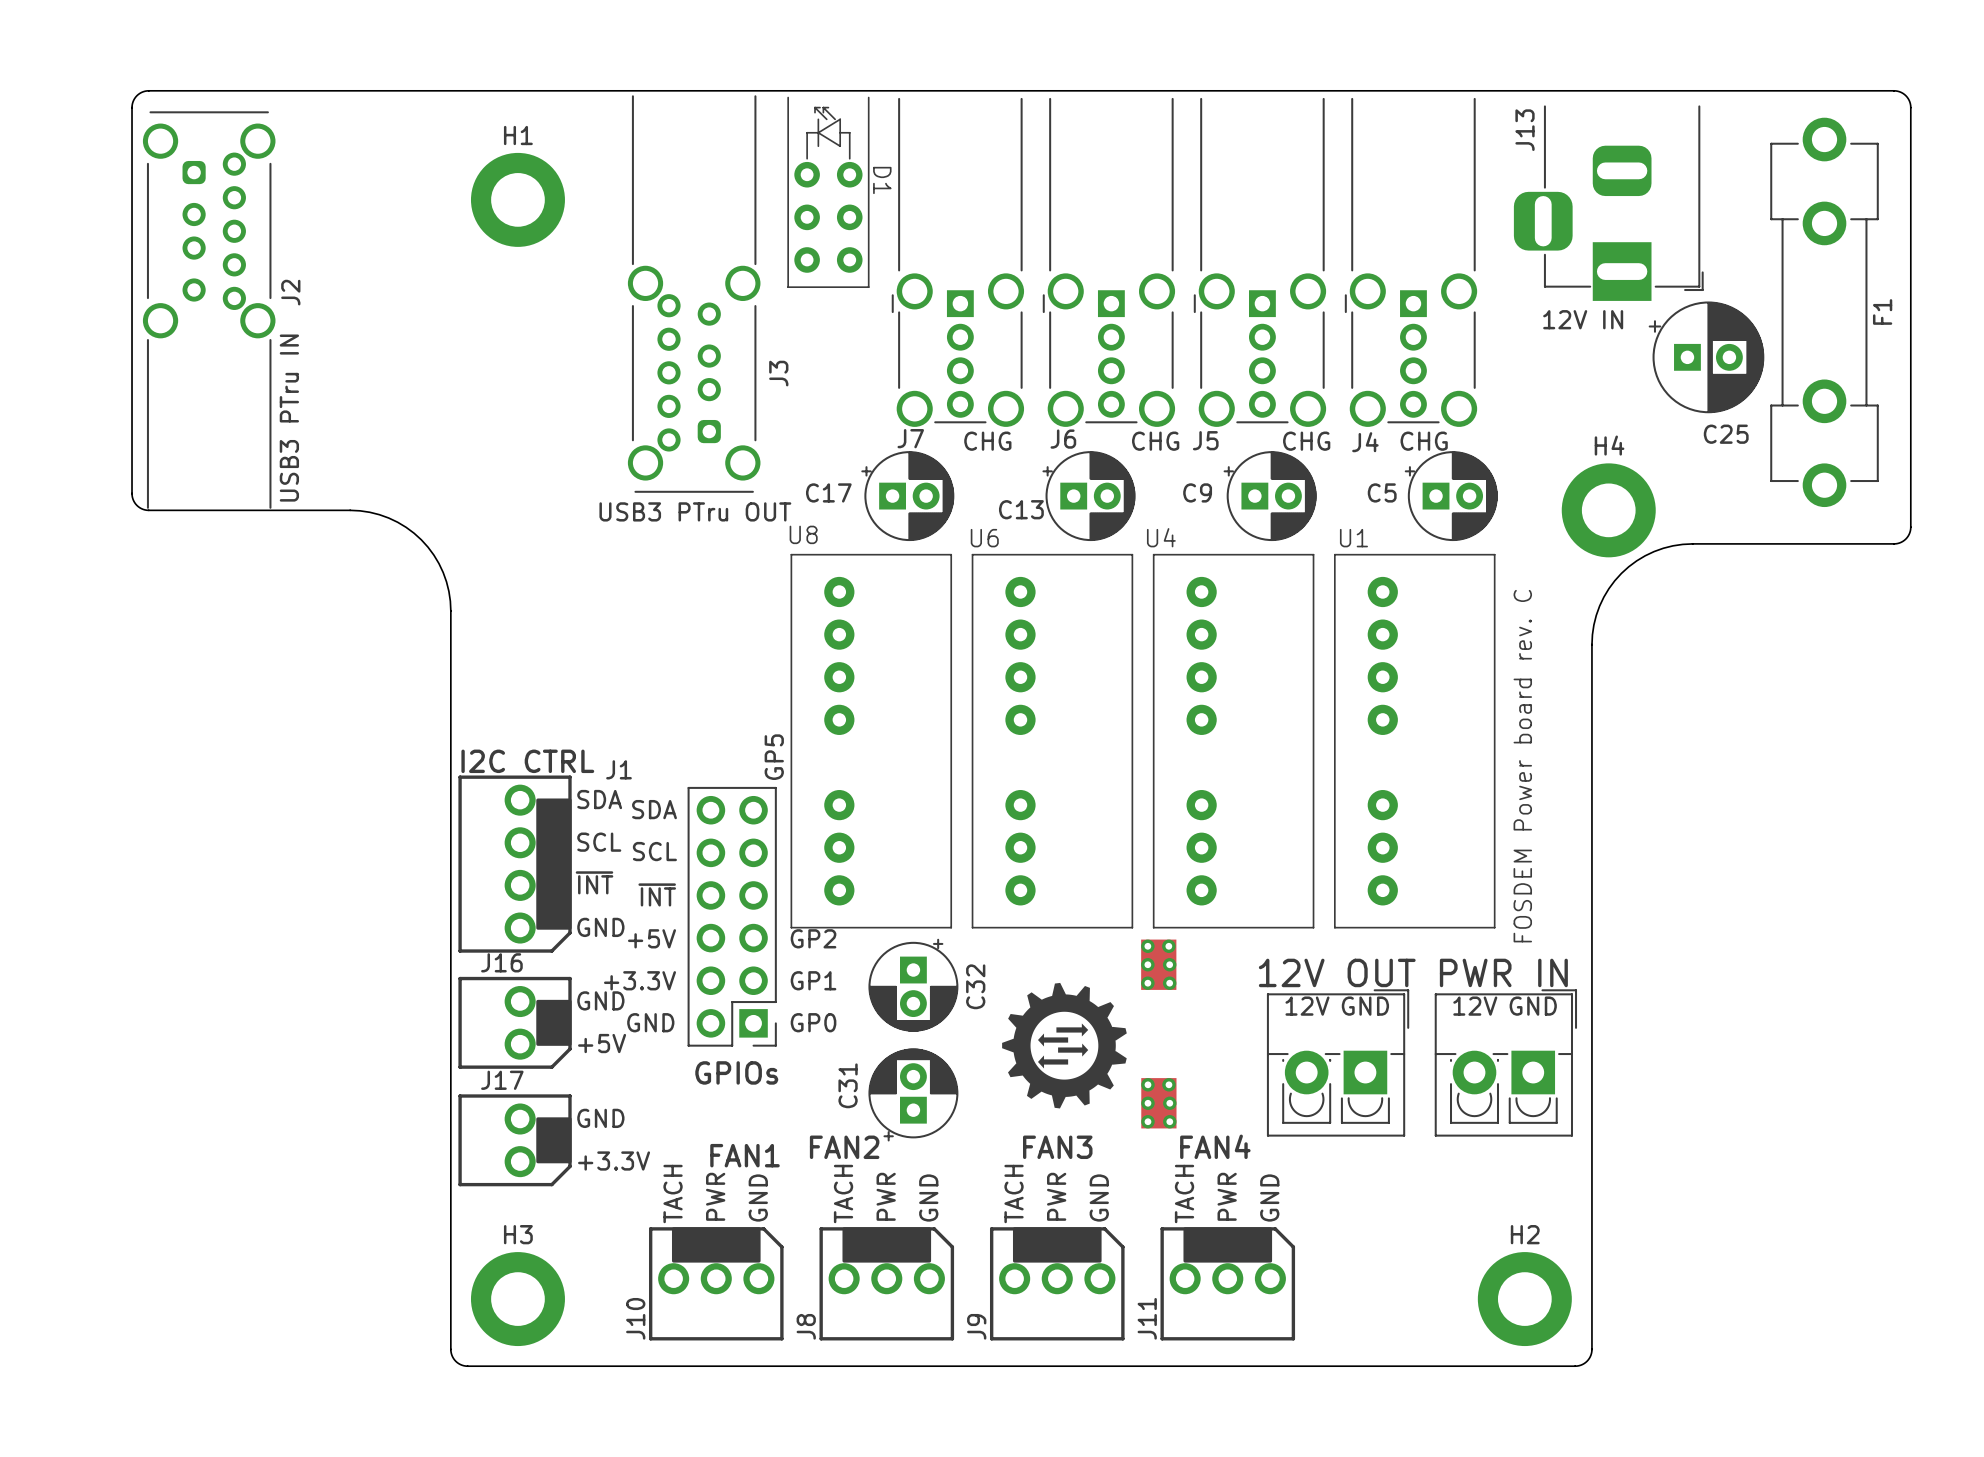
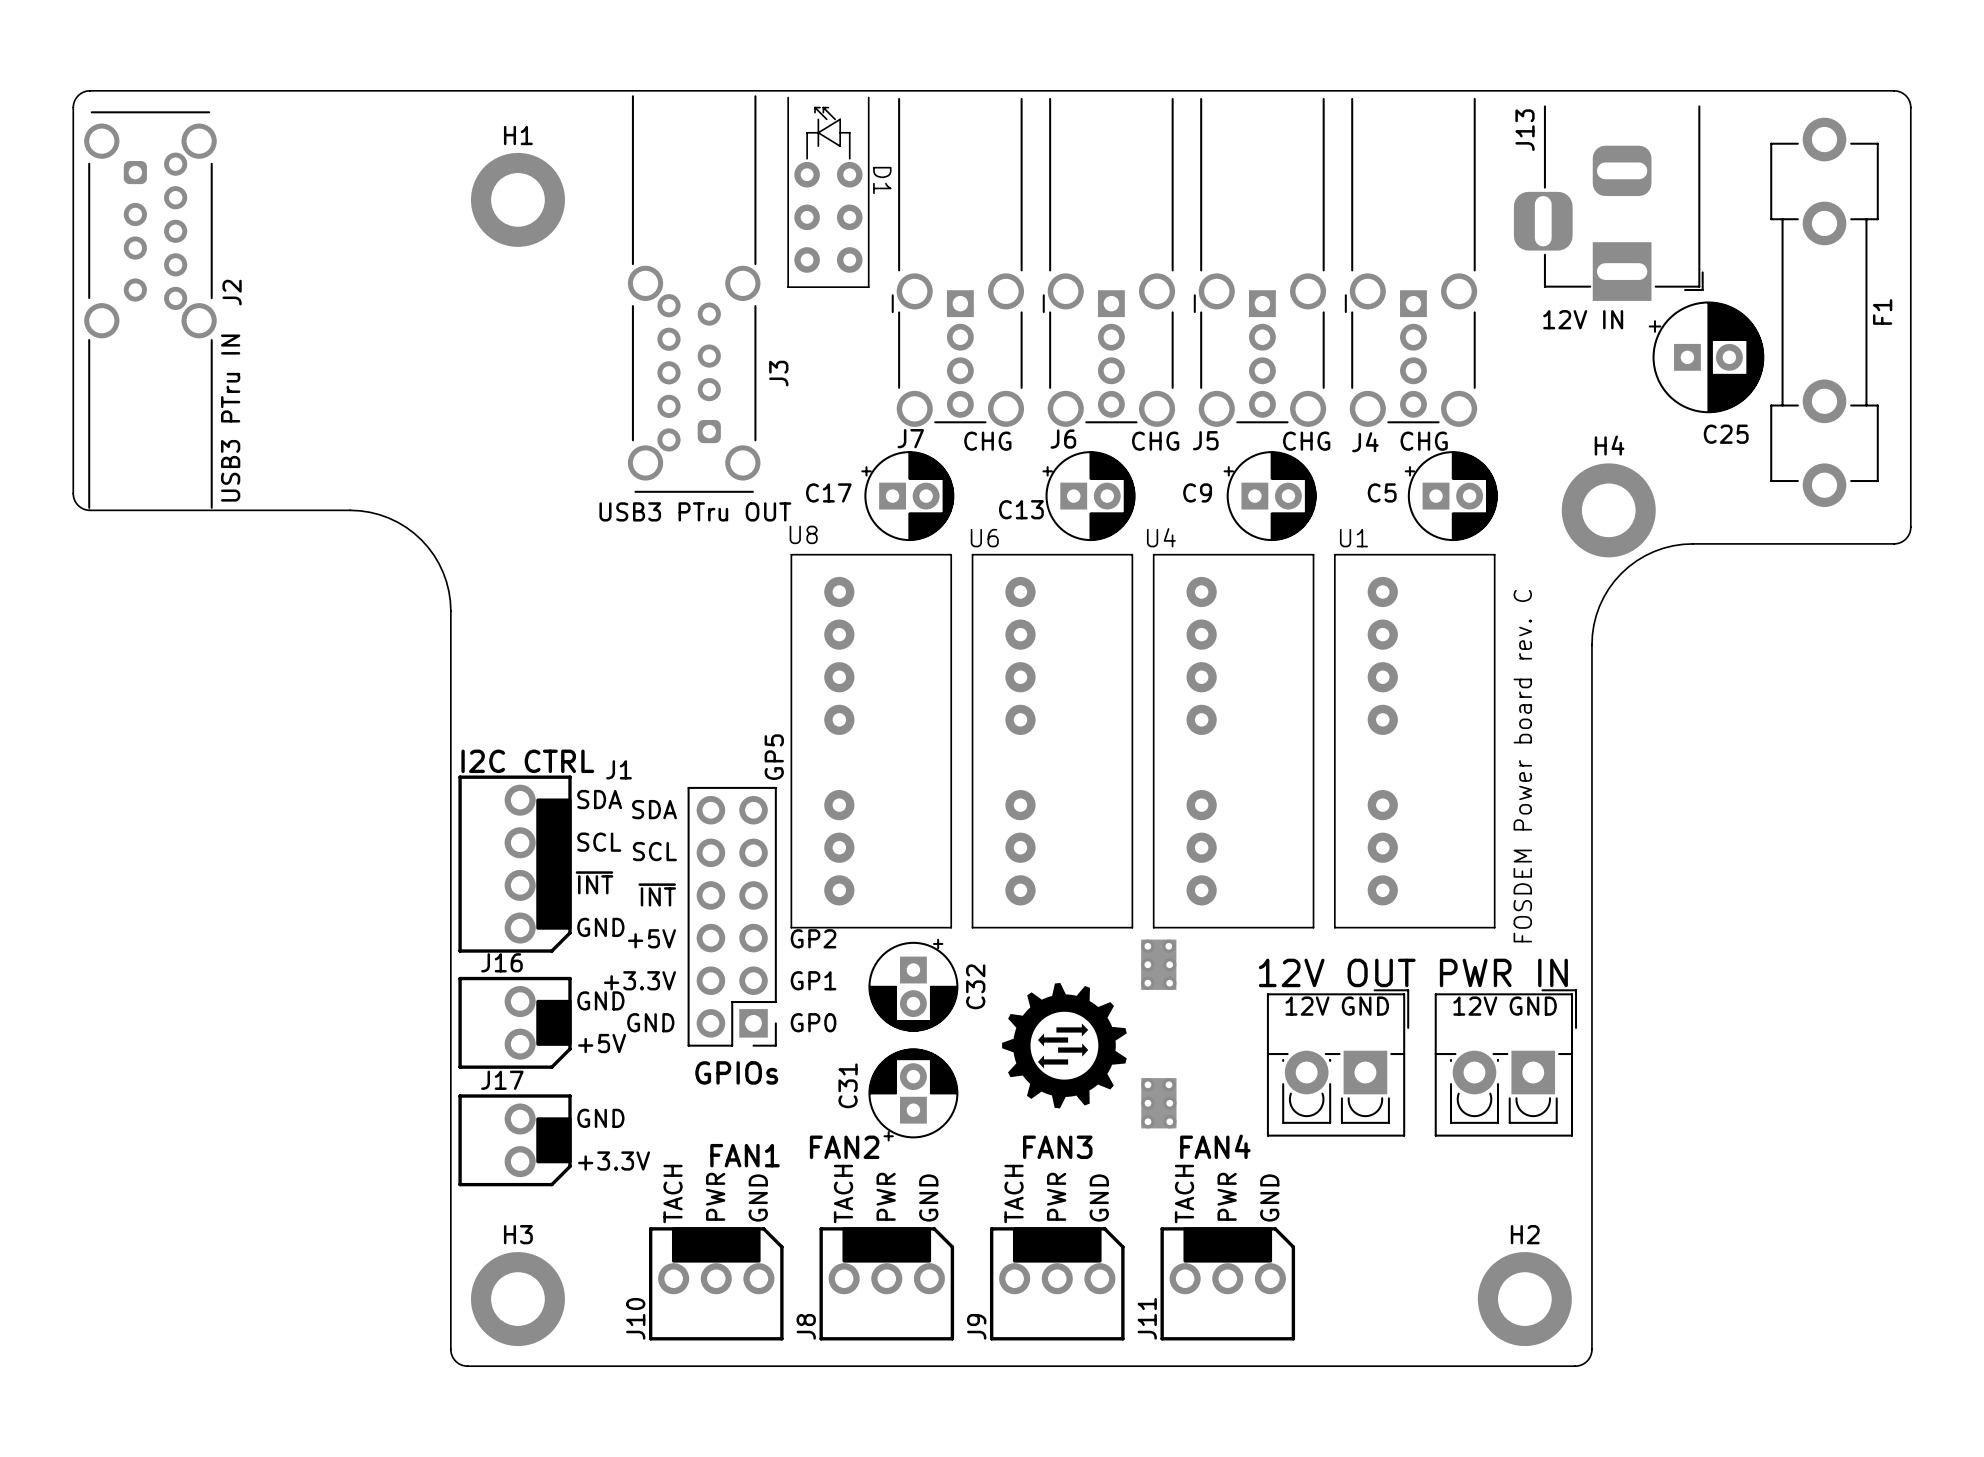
board edge: (148, 90) (136, 95) (132, 107) (132, 493) (136, 505) (148, 510) -> (148, 90) (86, 91) (76, 97) (73, 107) (73, 497) (78, 505) (86, 509) (148, 510)
J2 position: (209, 310) -> (150, 310)

